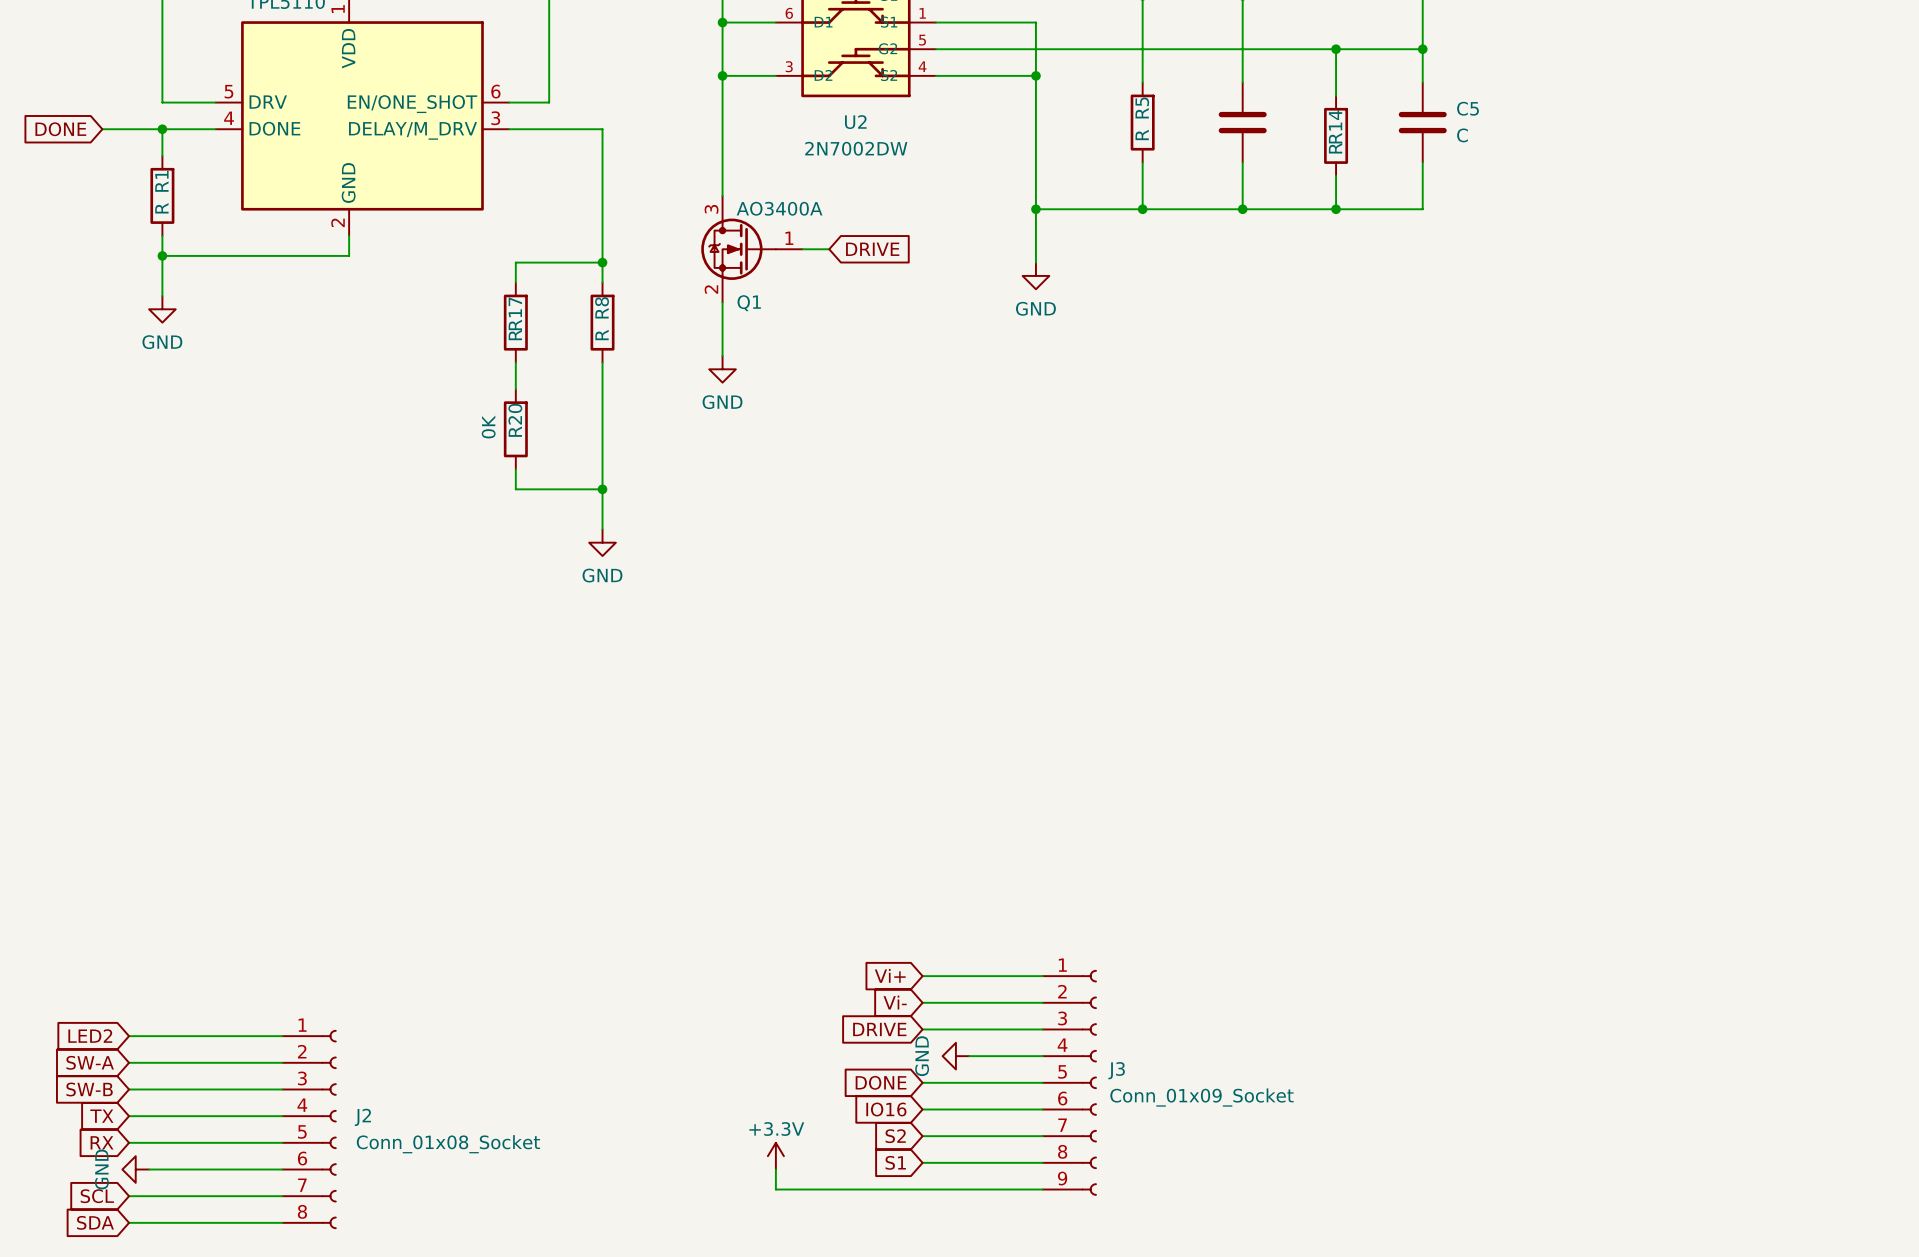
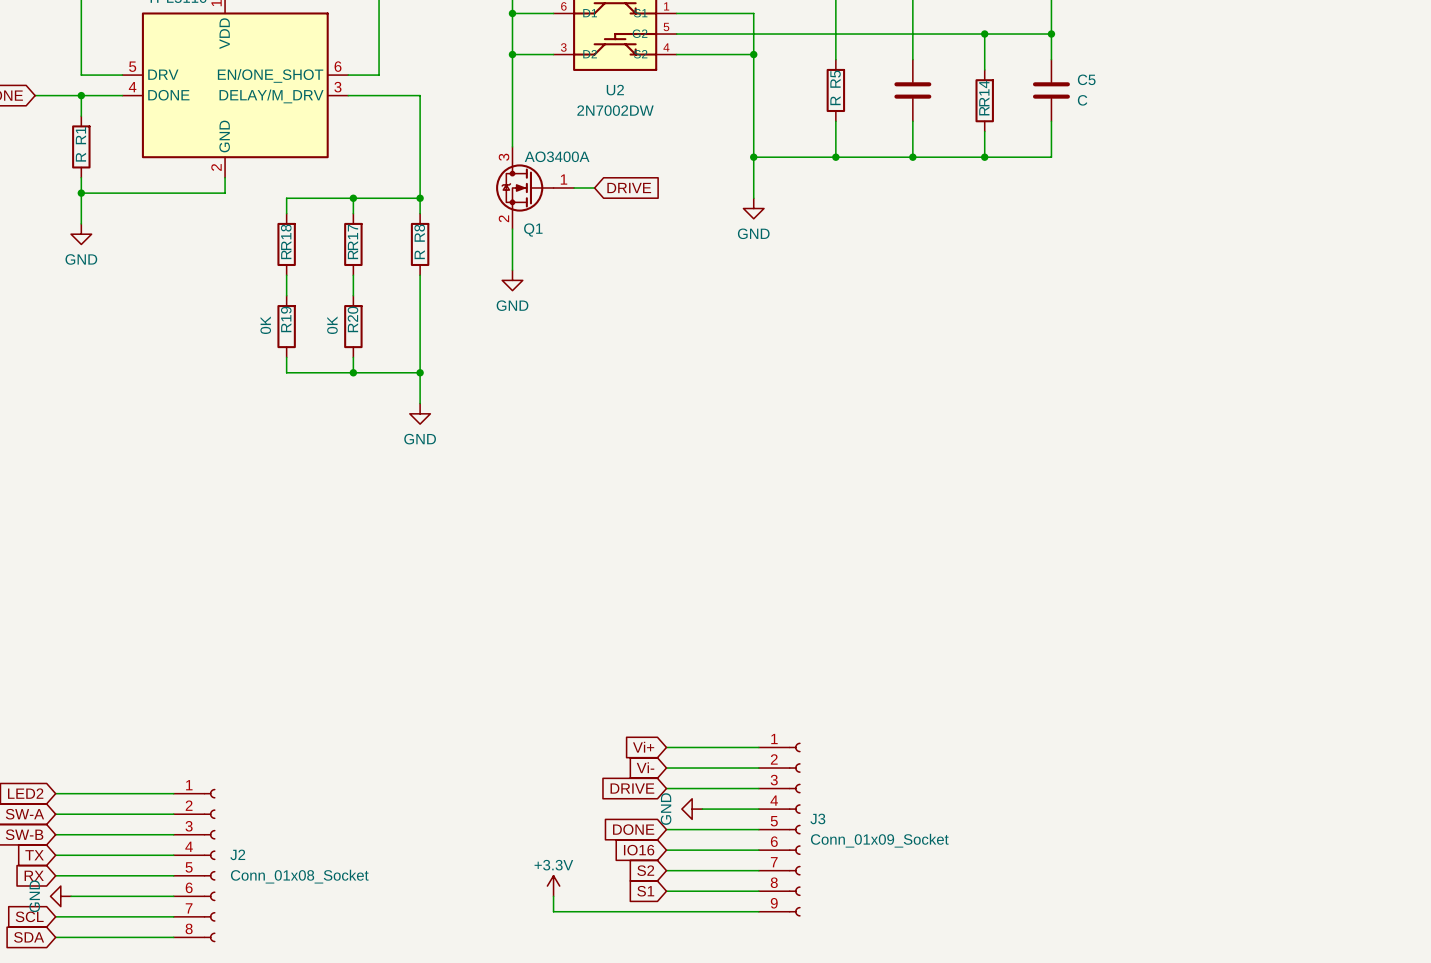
wire: none -> (353, 198) (286, 198) (286, 213)
junction: none -> (353, 198)
R18: none -> R (286, 244)
wire: none -> (286, 275) (286, 295)
R19: none -> 0K (286, 326)
wire: none -> (286, 357) (286, 372) (353, 372)
junction: none -> (353, 372)

